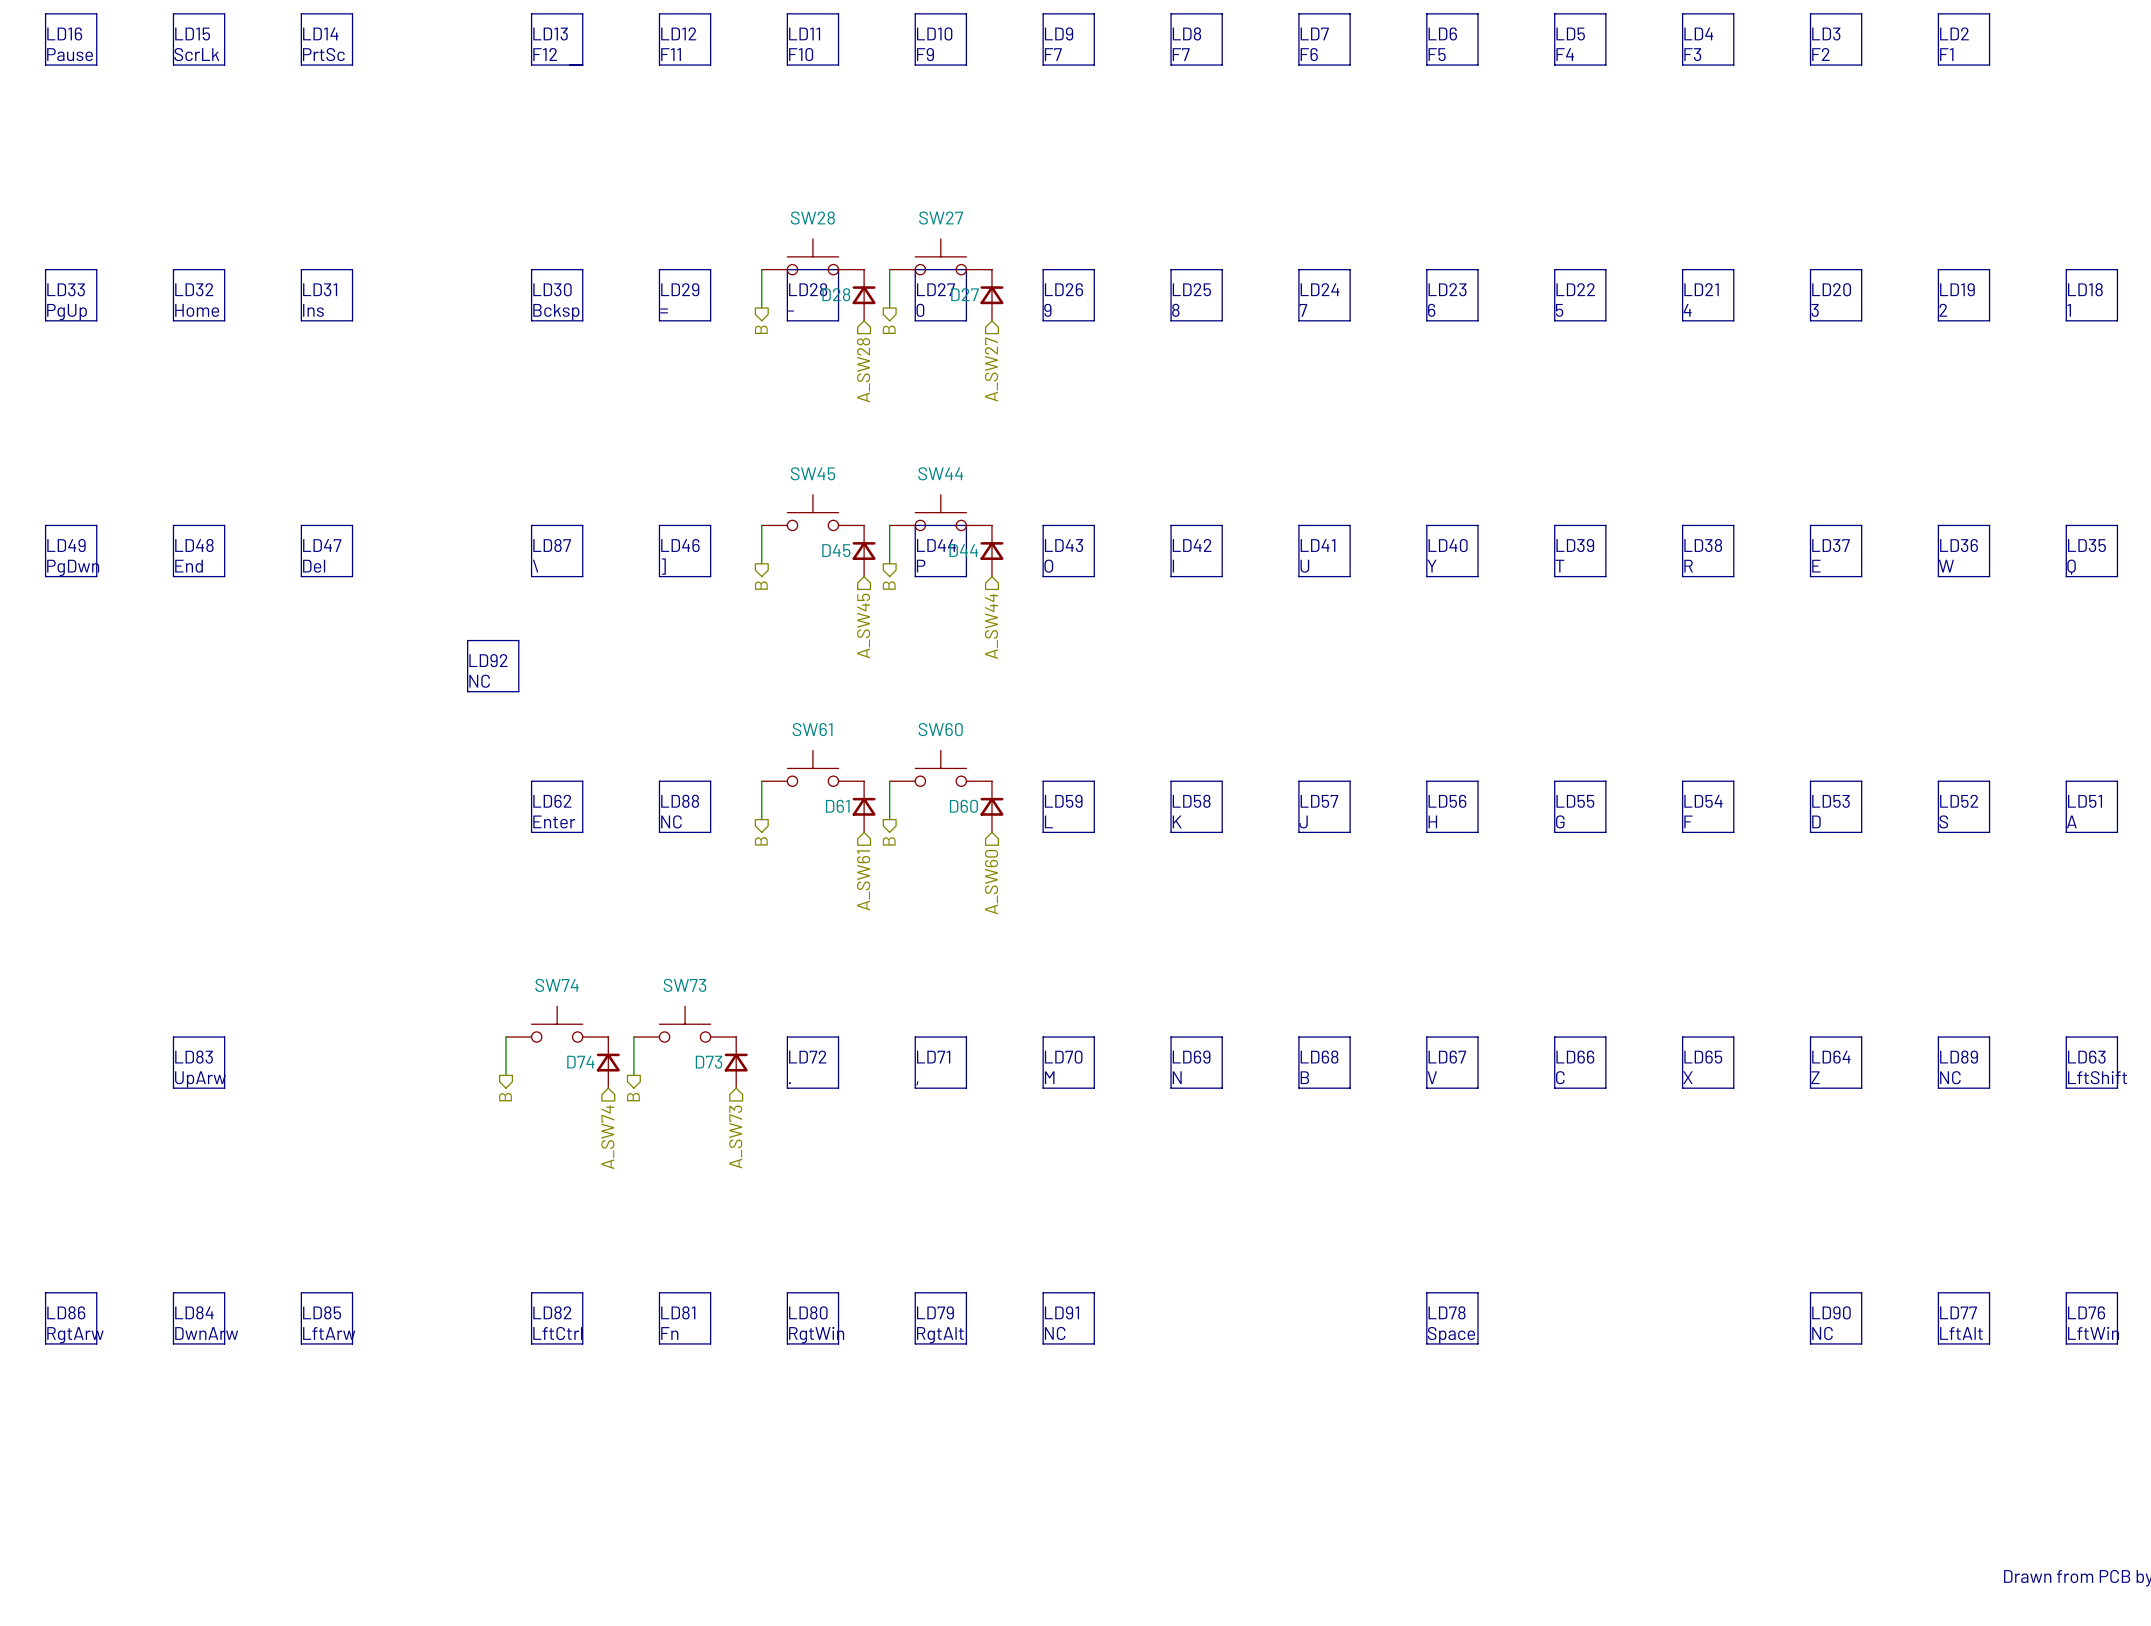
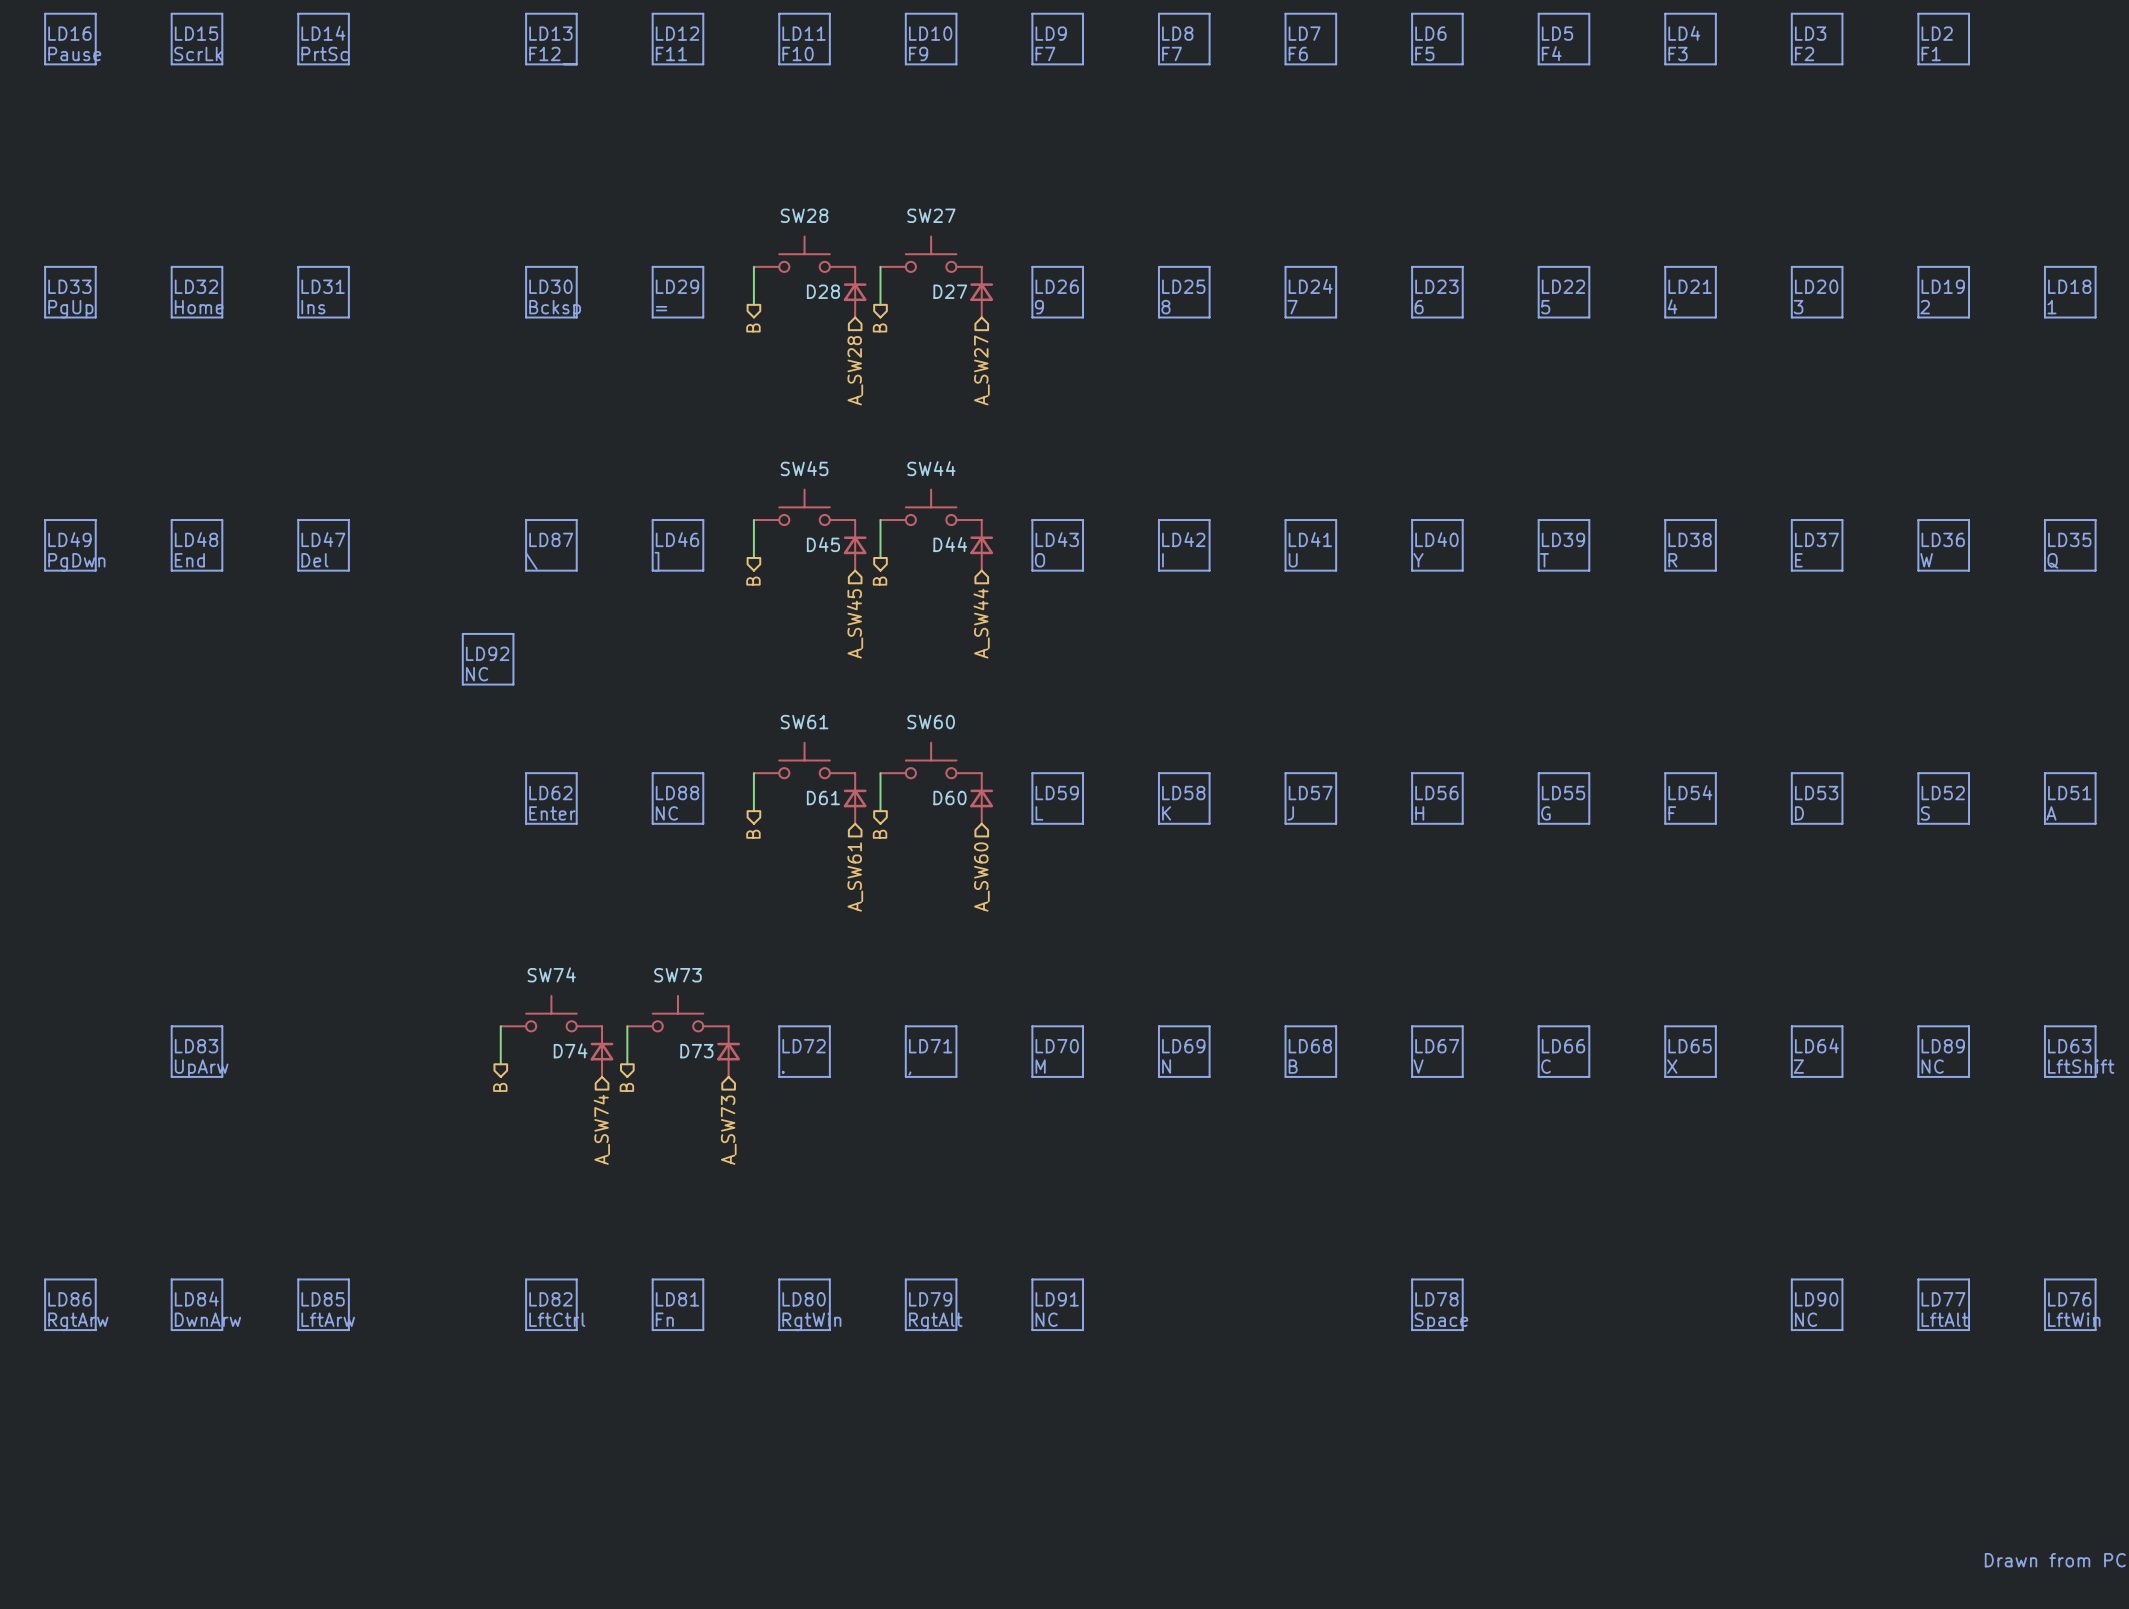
line: (787, 269) (787, 320) (838, 320) (838, 269) (787, 269) -> none
line: (915, 269) (915, 320) (966, 320) (966, 269) (915, 269) -> none
text: LD28 (808, 289) -> none
text: LD27 (935, 289) -> none
text: 0 (920, 310) -> none
text: - (790, 311) -> none
line: (915, 525) (915, 576) (966, 576) (966, 525) (915, 525) -> none
text: LD44 (936, 545) -> none
text: P (921, 566) -> none

